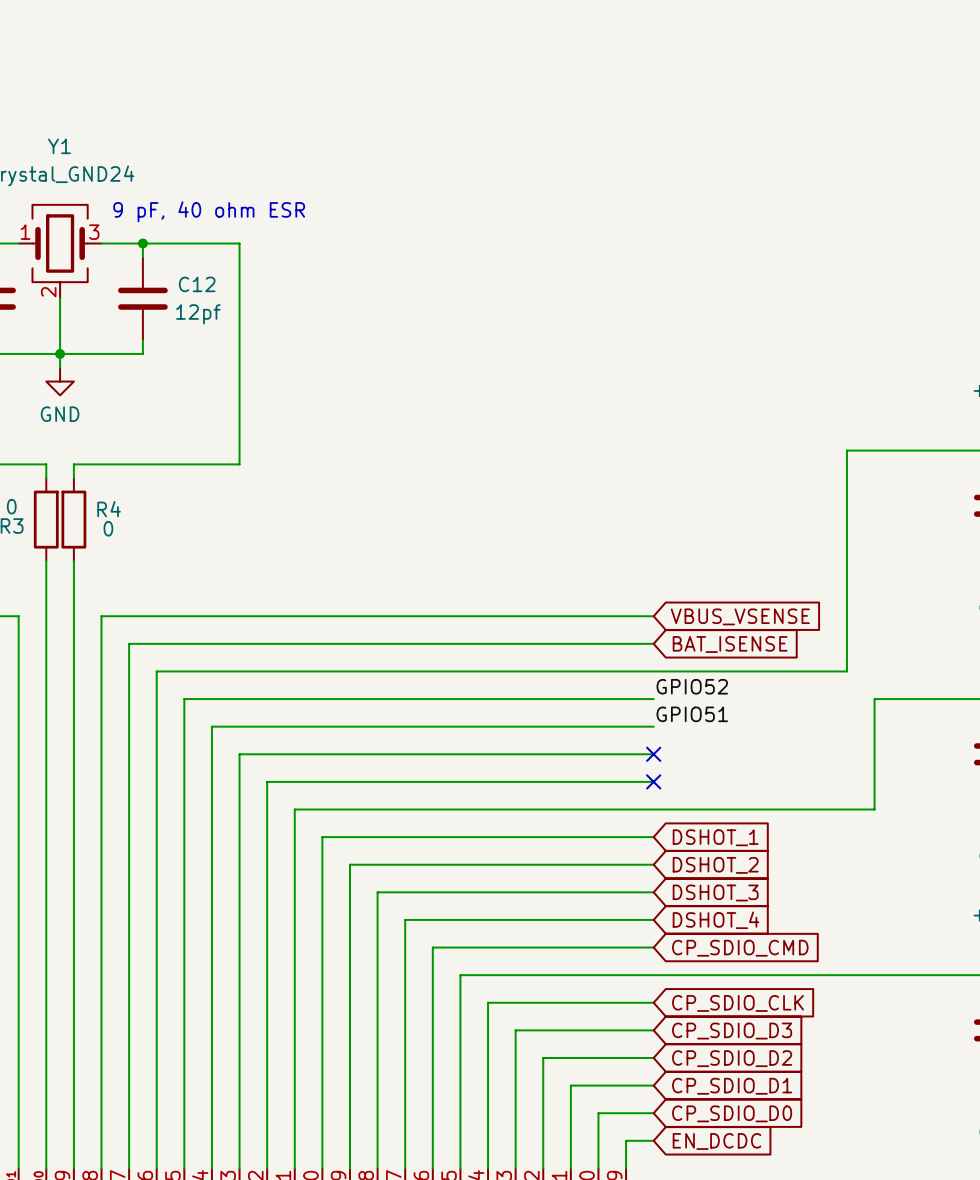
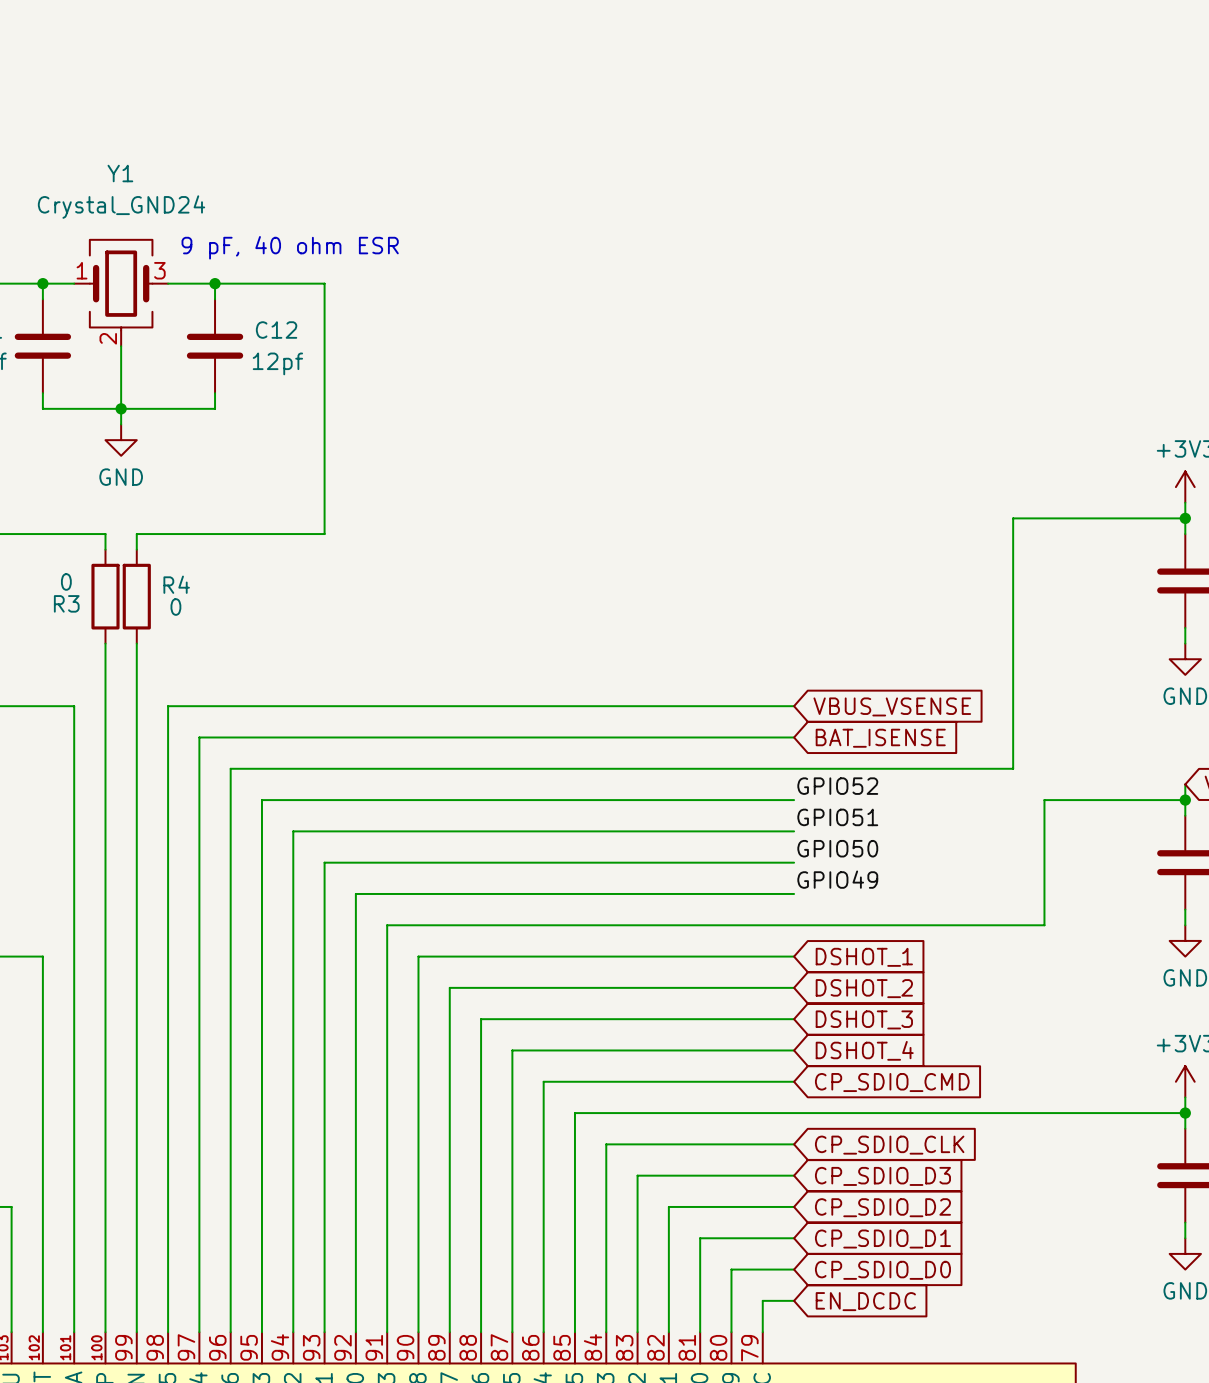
label: none -> GPIO50 (837, 848)
no-connect mark: (653, 754) -> none
label: none -> GPIO49 (837, 879)
no-connect mark: (653, 781) -> none

